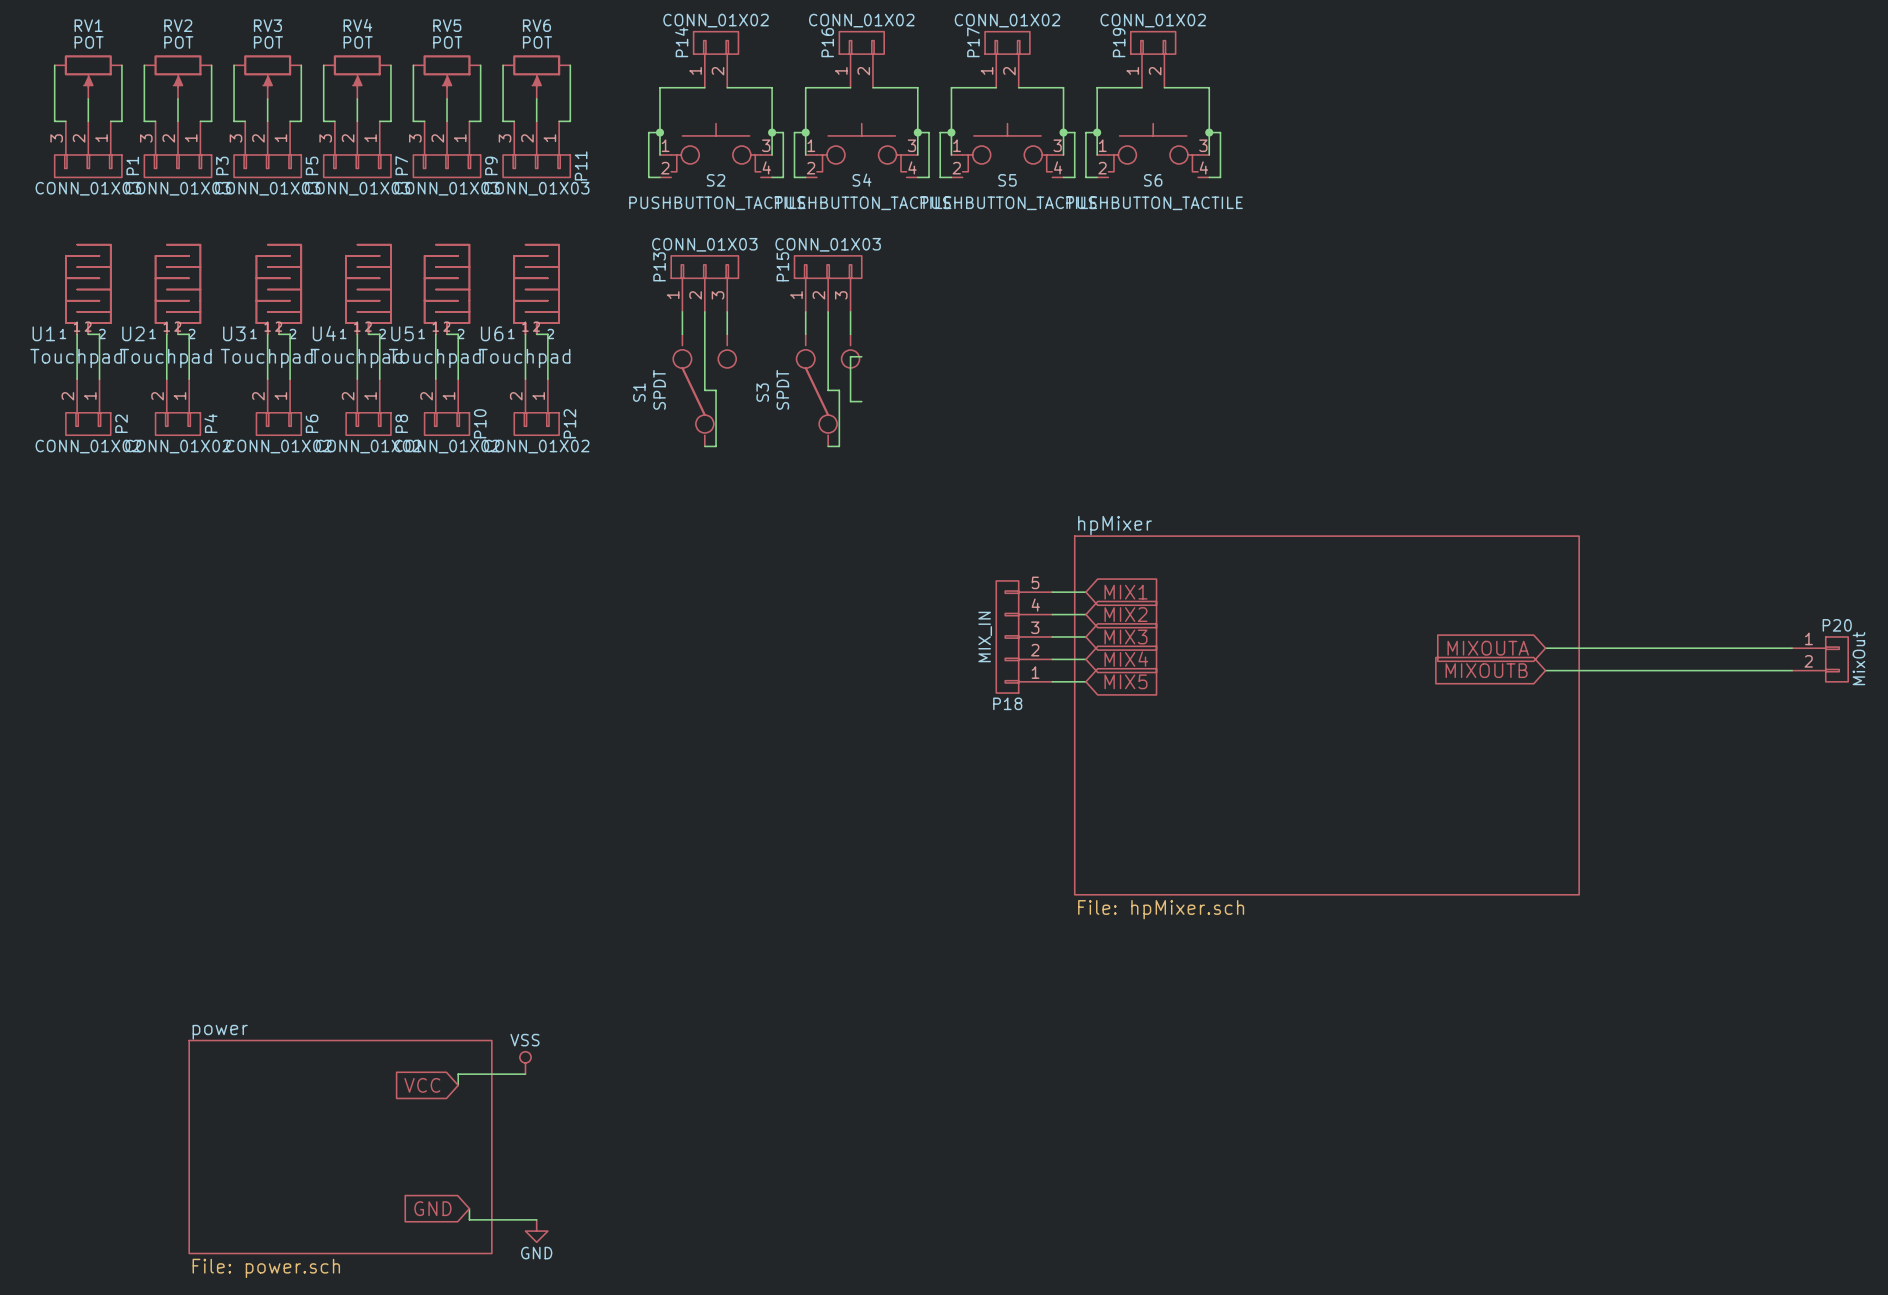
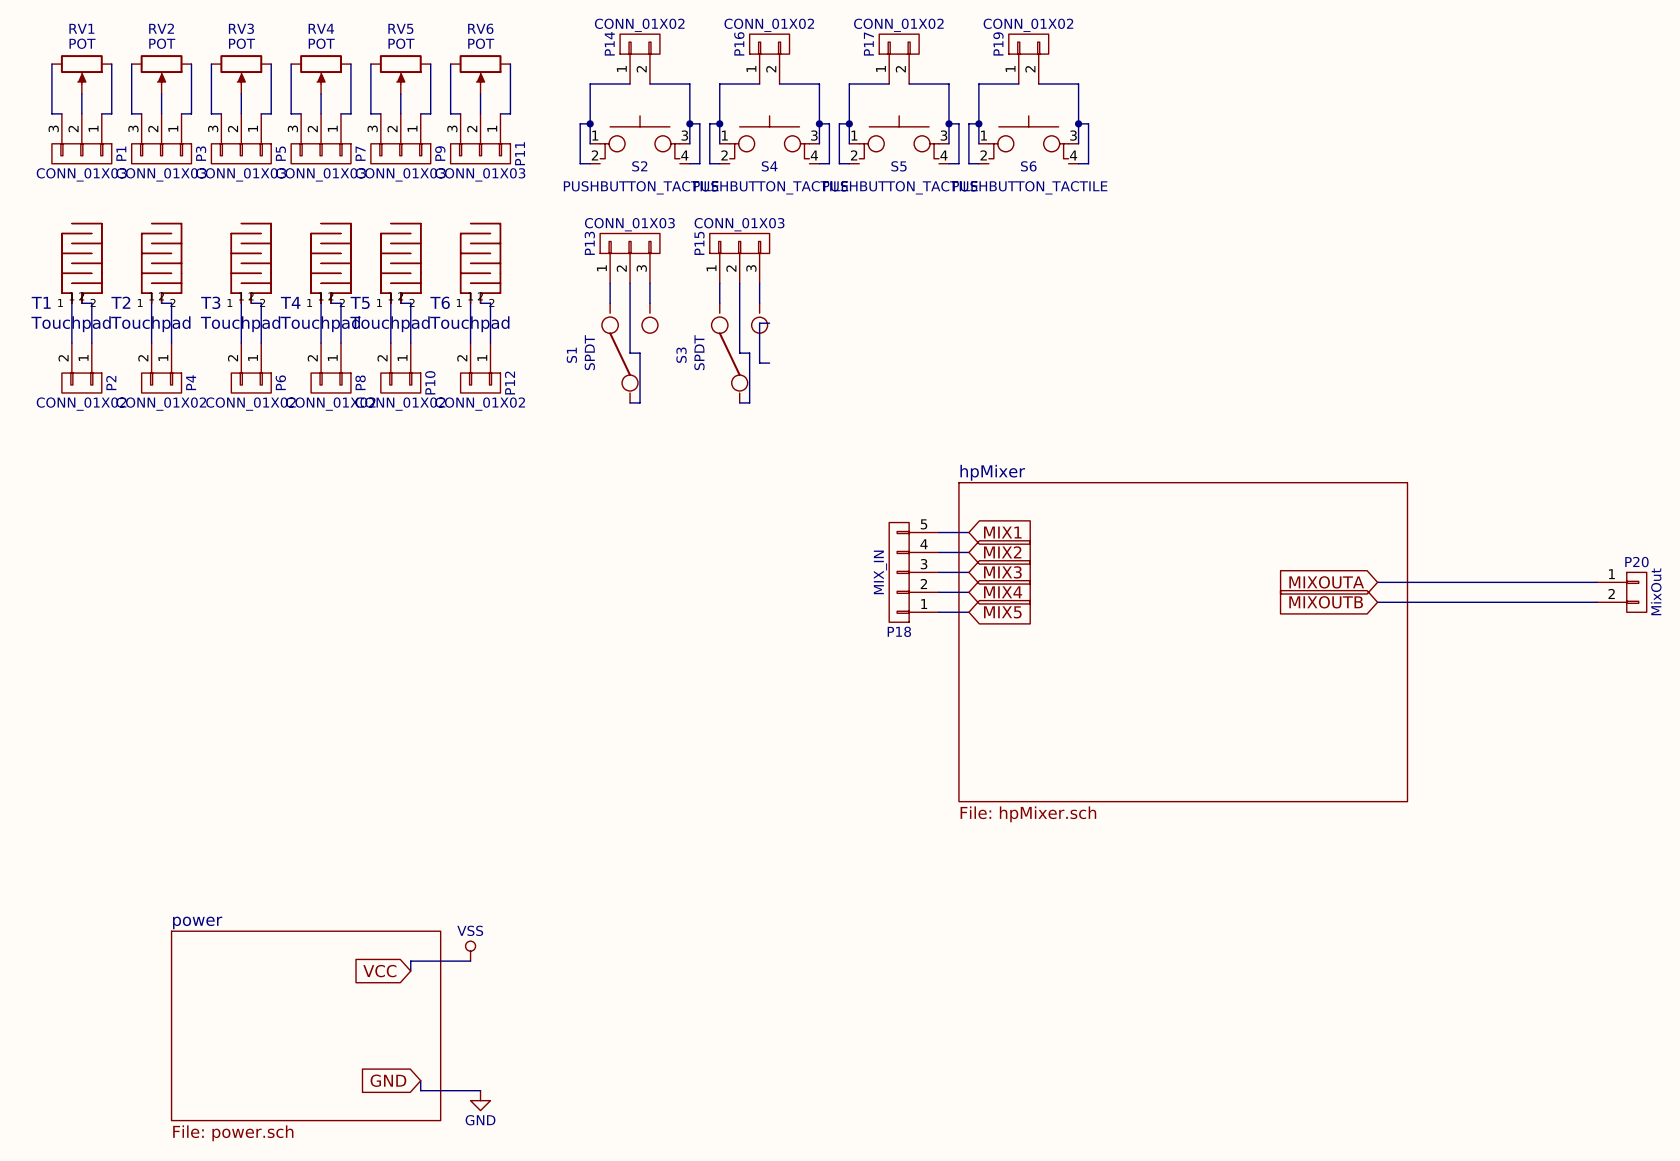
U1 name: U1 (43, 333) -> T1 (41, 302)
U2 name: U2 (133, 333) -> T2 (120, 302)
U3 name: U3 (234, 333) -> T3 (210, 302)
U4 name: U4 (324, 333) -> T4 (290, 302)
U5 name: U5 (402, 333) -> T5 (360, 302)
U6 name: U6 (492, 333) -> T6 (440, 302)

